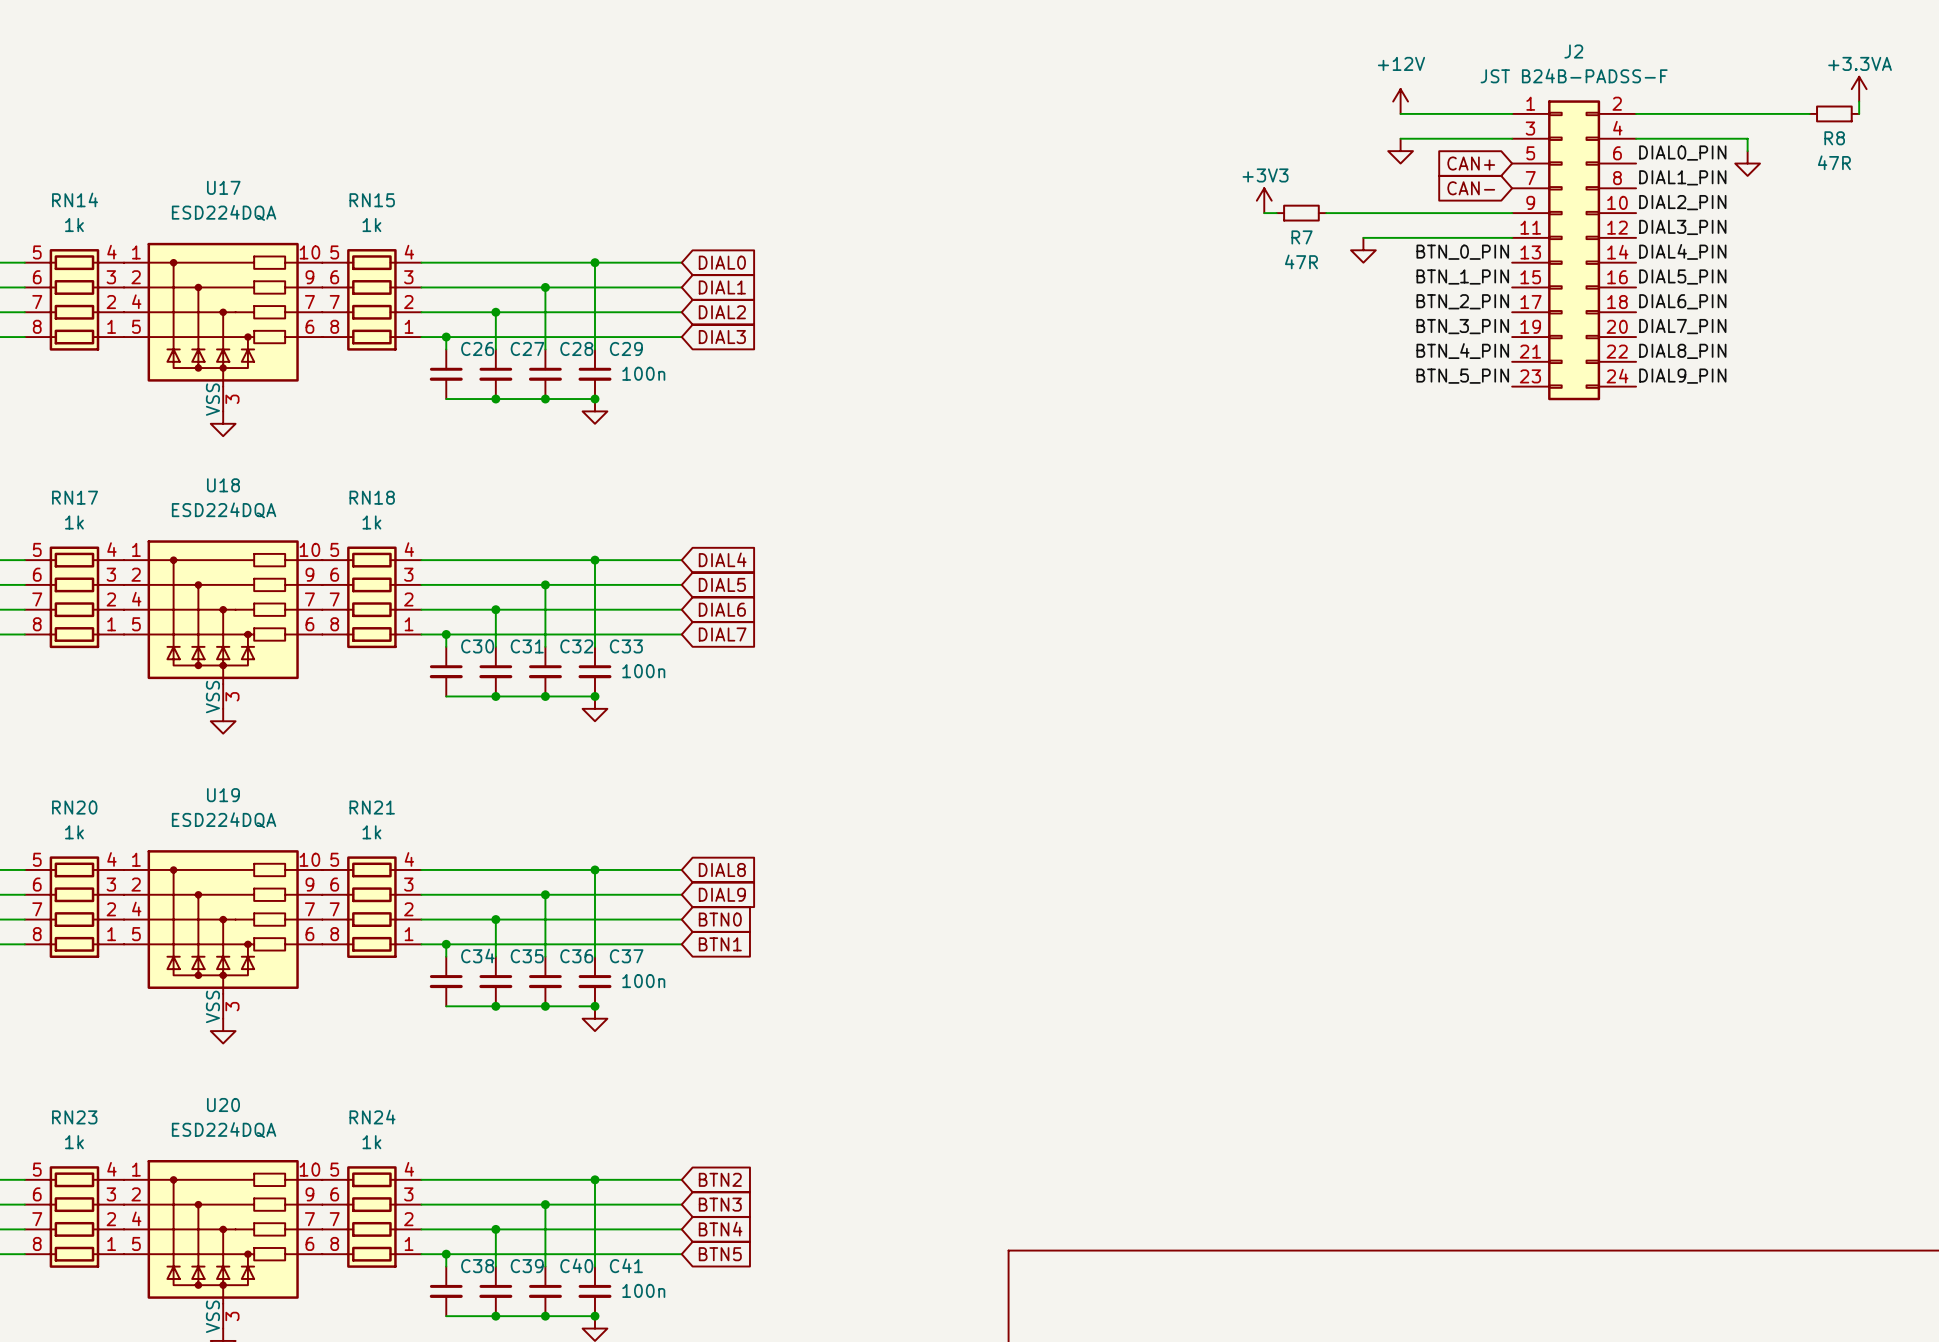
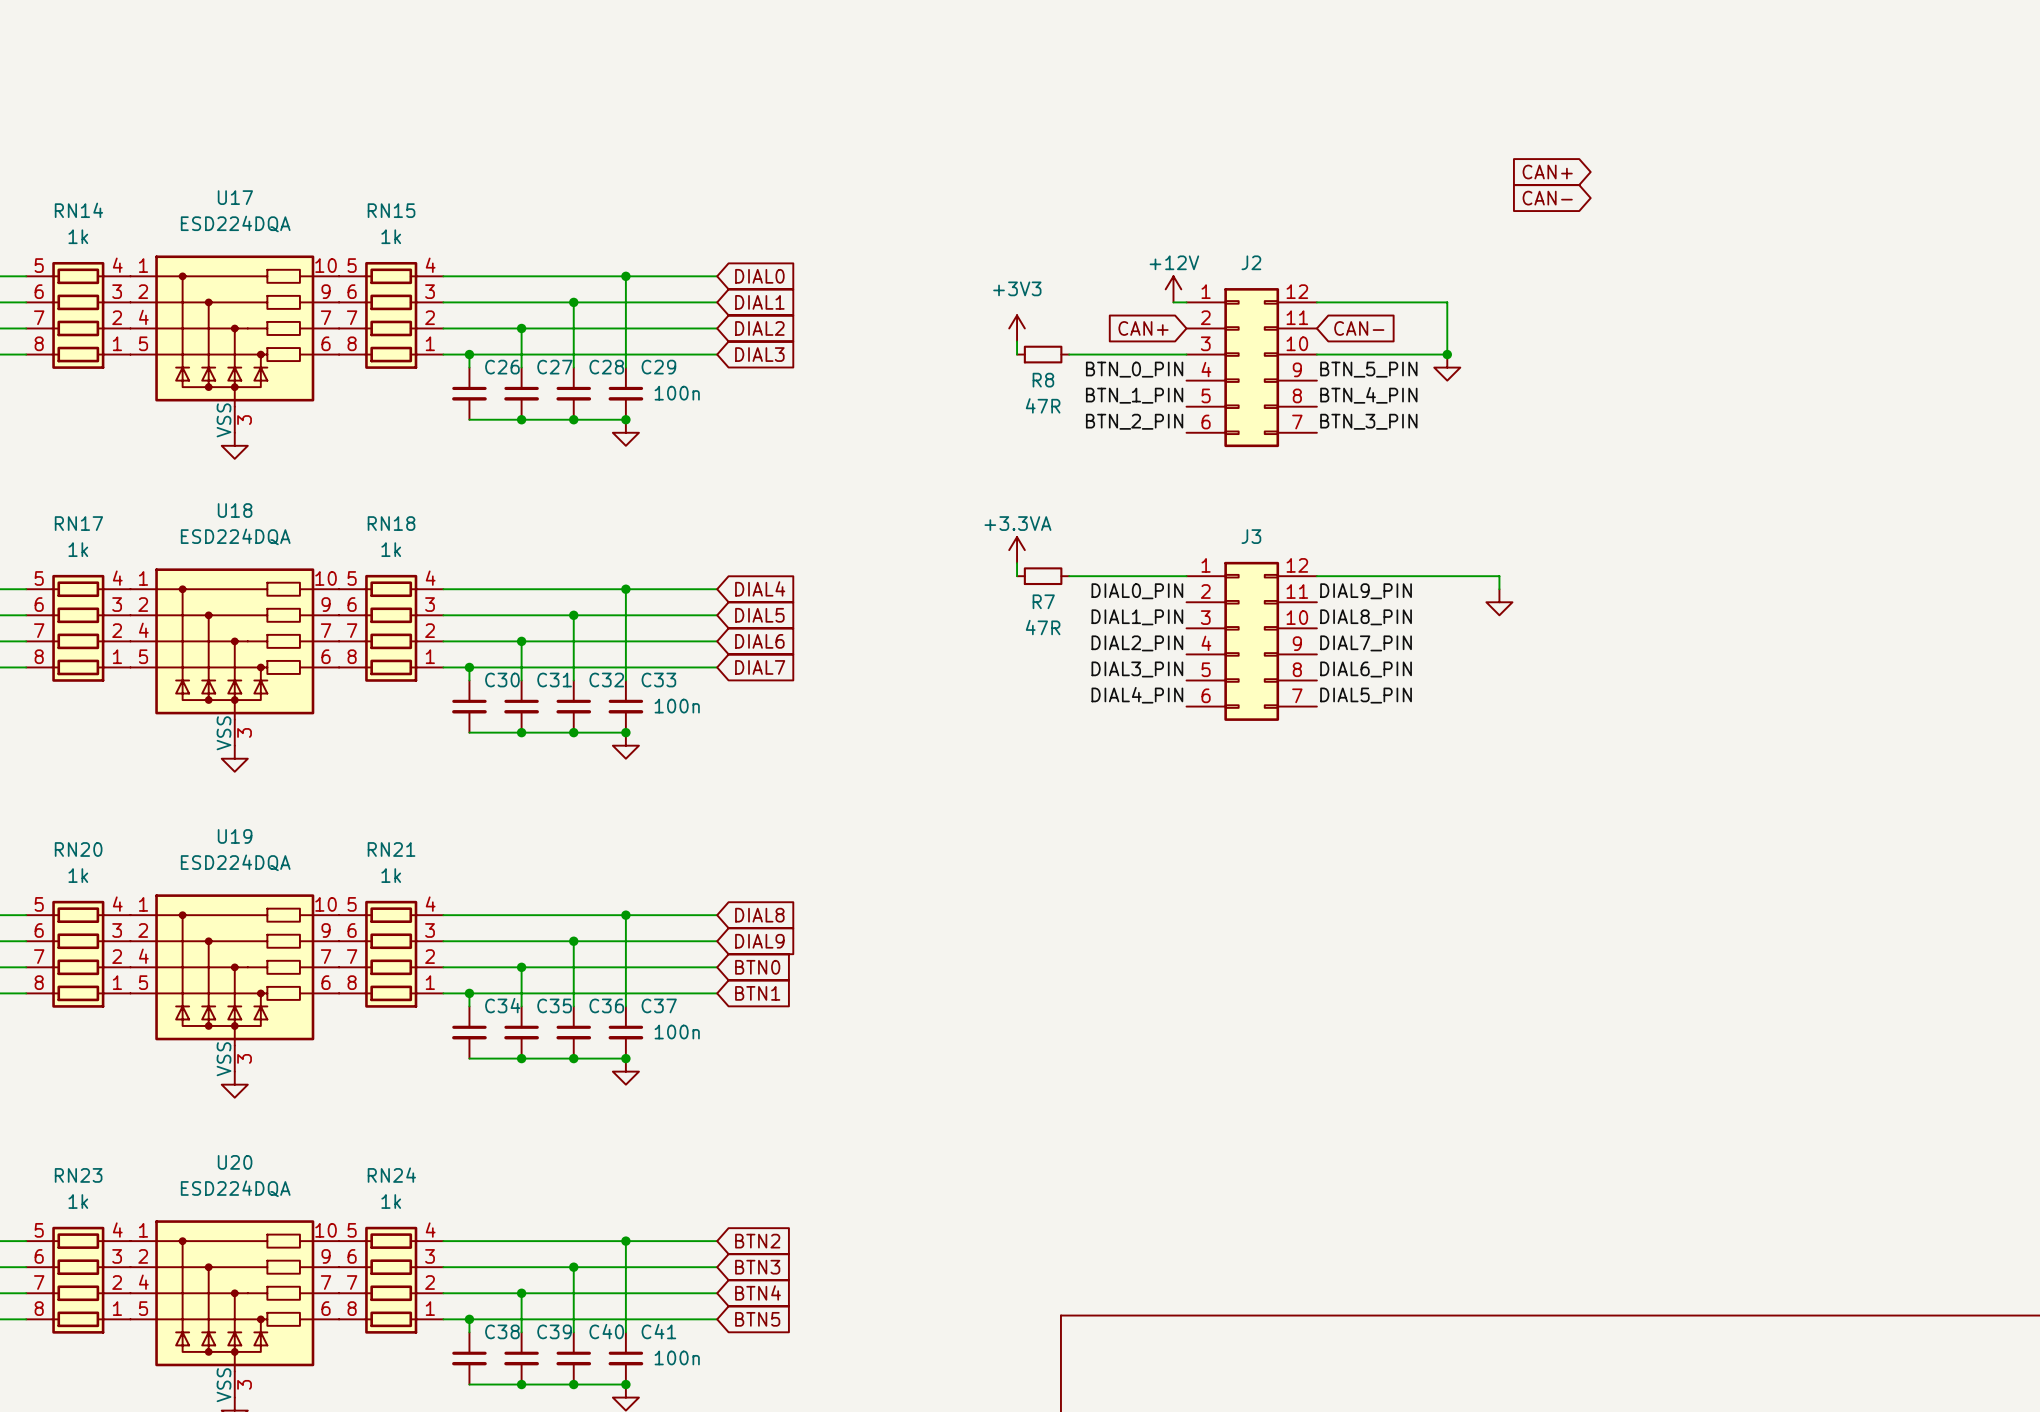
J2 name position: J2 (1573, 51) -> J2 (1251, 262)
J2 value: JST B24B-PADSS-F (1574, 76) -> none
power symbol: +3.3VA (1859, 89) -> none
J2 symbol: [1512, 100, 1637, 401] -> [1186, 288, 1317, 448]
power symbol: +12V (1400, 101) -> none
wire: (1859, 101) (1859, 113) -> none
wire: (1400, 113) (1512, 113) -> none
wire: (1636, 113) (1809, 113) -> none
R8 position: (1834, 113) -> (1043, 354)
wire: (1400, 138) (1512, 138) -> none
wire: (1636, 138) (1747, 138) (1747, 151) -> none
power symbol: (1400, 151) -> none
label: DIAL0_PIN (1682, 153) -> none
power symbol: (1747, 163) -> none
label: DIAL1_PIN (1682, 177) -> none
power symbol: +3V3 (1264, 200) -> none
label: DIAL2_PIN (1682, 202) -> none
wire: (1264, 213) (1276, 213) -> (1173, 302) (1186, 302)
R7 position: (1301, 213) -> (1043, 576)
wire: (1326, 213) (1512, 213) -> none
label: DIAL3_PIN (1682, 227) -> none
wire: (1363, 237) (1512, 237) -> none
power symbol: (1363, 250) -> none
label: DIAL4_PIN (1682, 251) -> none
label: BTN_0_PIN (1462, 252) -> none
power symbol: none -> +12V (1173, 289)
label: BTN_1_PIN (1462, 276) -> none
label: DIAL5_PIN (1682, 276) -> none
wire: none -> (1316, 302) (1447, 302) (1447, 354) (1316, 354)
label: BTN_2_PIN (1462, 301) -> none
label: DIAL6_PIN (1682, 301) -> none
power symbol: none -> +3V3 (1017, 328)
global label: none -> CAN+ (1143, 328)
global label: none -> CAN- (1359, 328)
wire: none -> (1017, 341) (1017, 354)
label: BTN_3_PIN (1462, 326) -> none
label: DIAL7_PIN (1682, 326) -> none
wire: none -> (1069, 354) (1186, 354)
junction: none -> (1447, 354)
power symbol: none -> (1447, 367)
label: none -> BTN_0_PIN (1134, 369)
label: none -> BTN_5_PIN (1368, 369)
label: BTN_4_PIN (1462, 351) -> none
label: DIAL8_PIN (1682, 351) -> none
label: none -> BTN_4_PIN (1368, 395)
label: none -> BTN_1_PIN (1134, 395)
label: BTN_5_PIN (1462, 376) -> none
label: DIAL9_PIN (1682, 376) -> none
label: none -> BTN_2_PIN (1134, 421)
label: none -> BTN_3_PIN (1368, 421)
power symbol: none -> +3.3VA (1017, 550)
wire: none -> (1017, 563) (1017, 576)
wire: none -> (1069, 576) (1186, 576)
wire: none -> (1316, 576) (1499, 576) (1499, 589)
label: none -> DIAL0_PIN (1137, 591)
label: none -> DIAL9_PIN (1366, 591)
power symbol: none -> (1499, 602)
label: none -> DIAL1_PIN (1137, 617)
label: none -> DIAL8_PIN (1366, 617)
J3: none -> (1251, 641)
label: none -> DIAL2_PIN (1137, 643)
label: none -> DIAL7_PIN (1366, 643)
label: none -> DIAL3_PIN (1137, 669)
label: none -> DIAL6_PIN (1366, 669)
label: none -> DIAL4_PIN (1137, 695)
label: none -> DIAL5_PIN (1366, 695)

